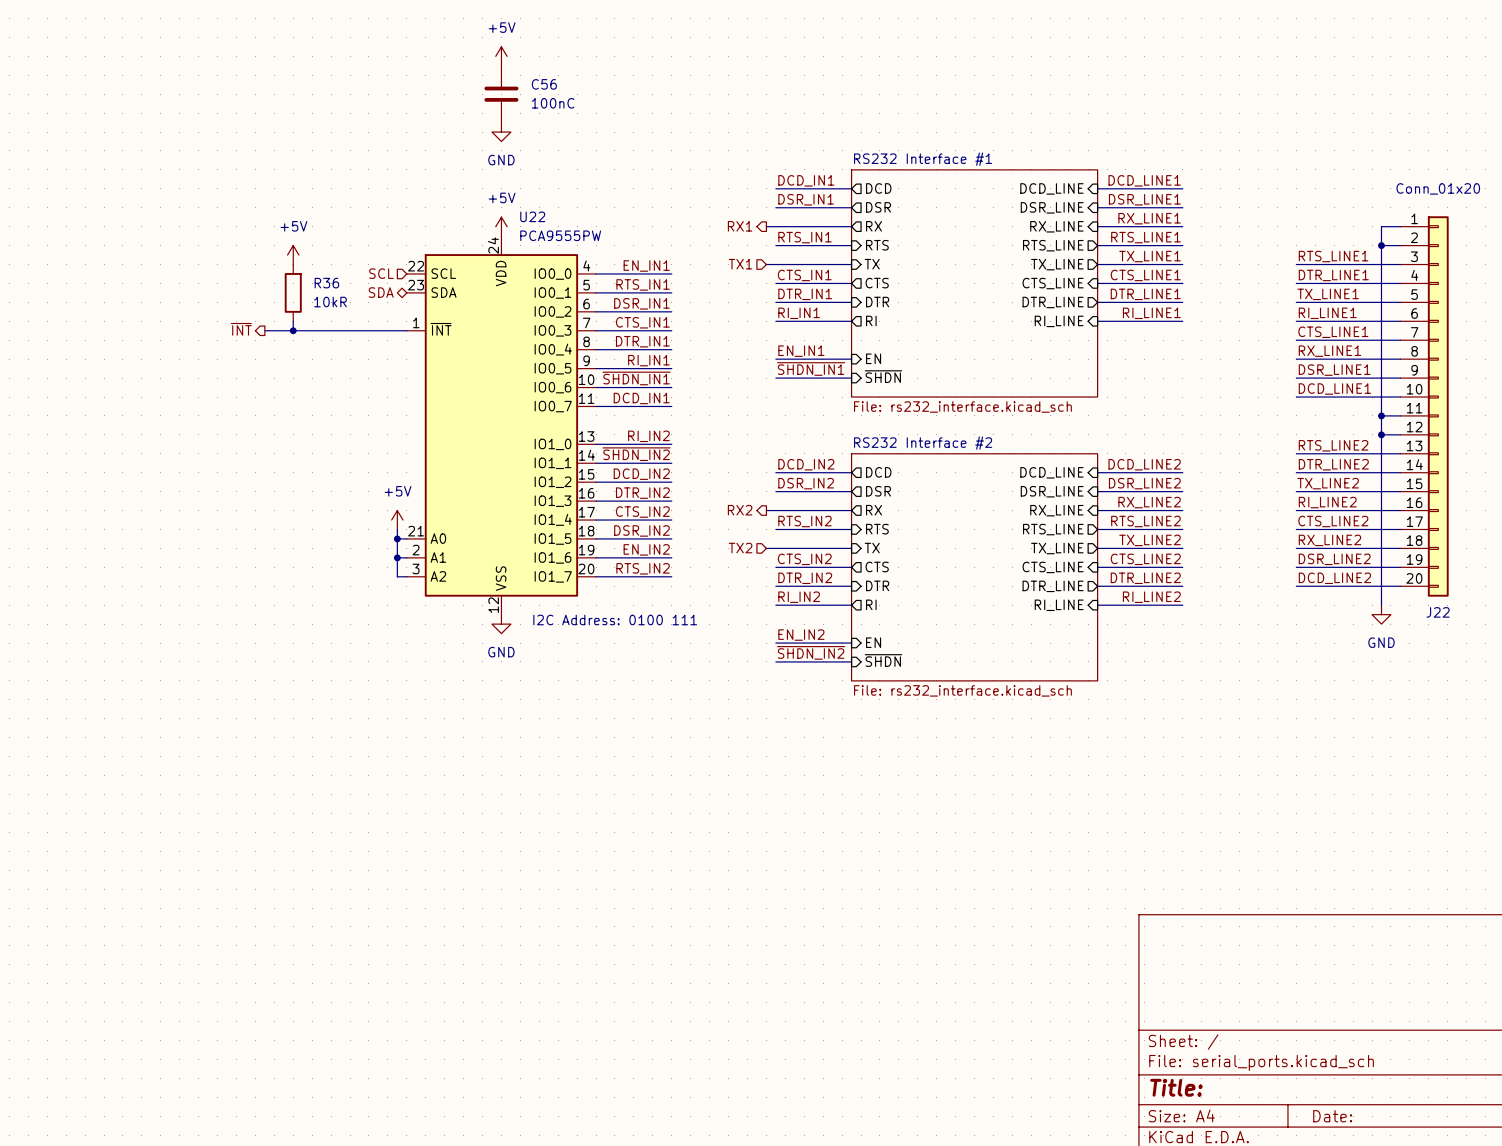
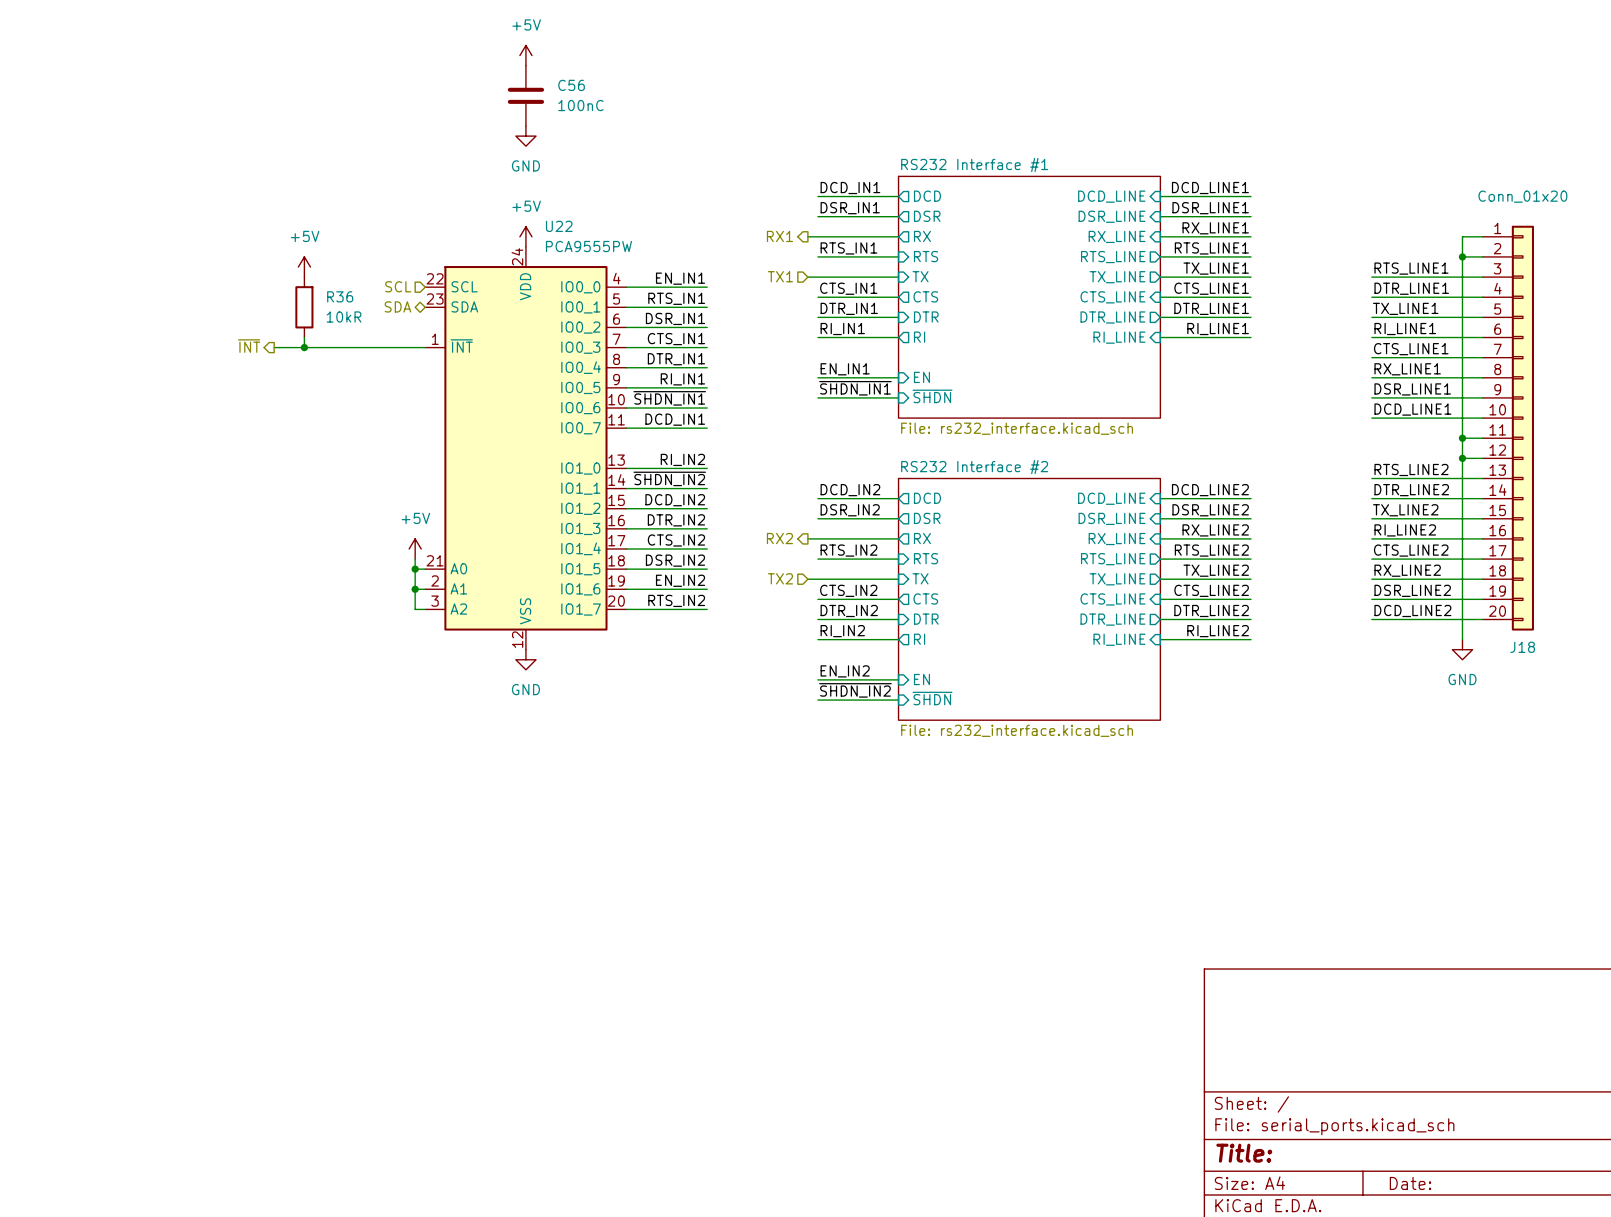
J22 name: J22 (1438, 612) -> J18 (1522, 647)
text: I2C Address: 0100 111 (615, 620) -> none

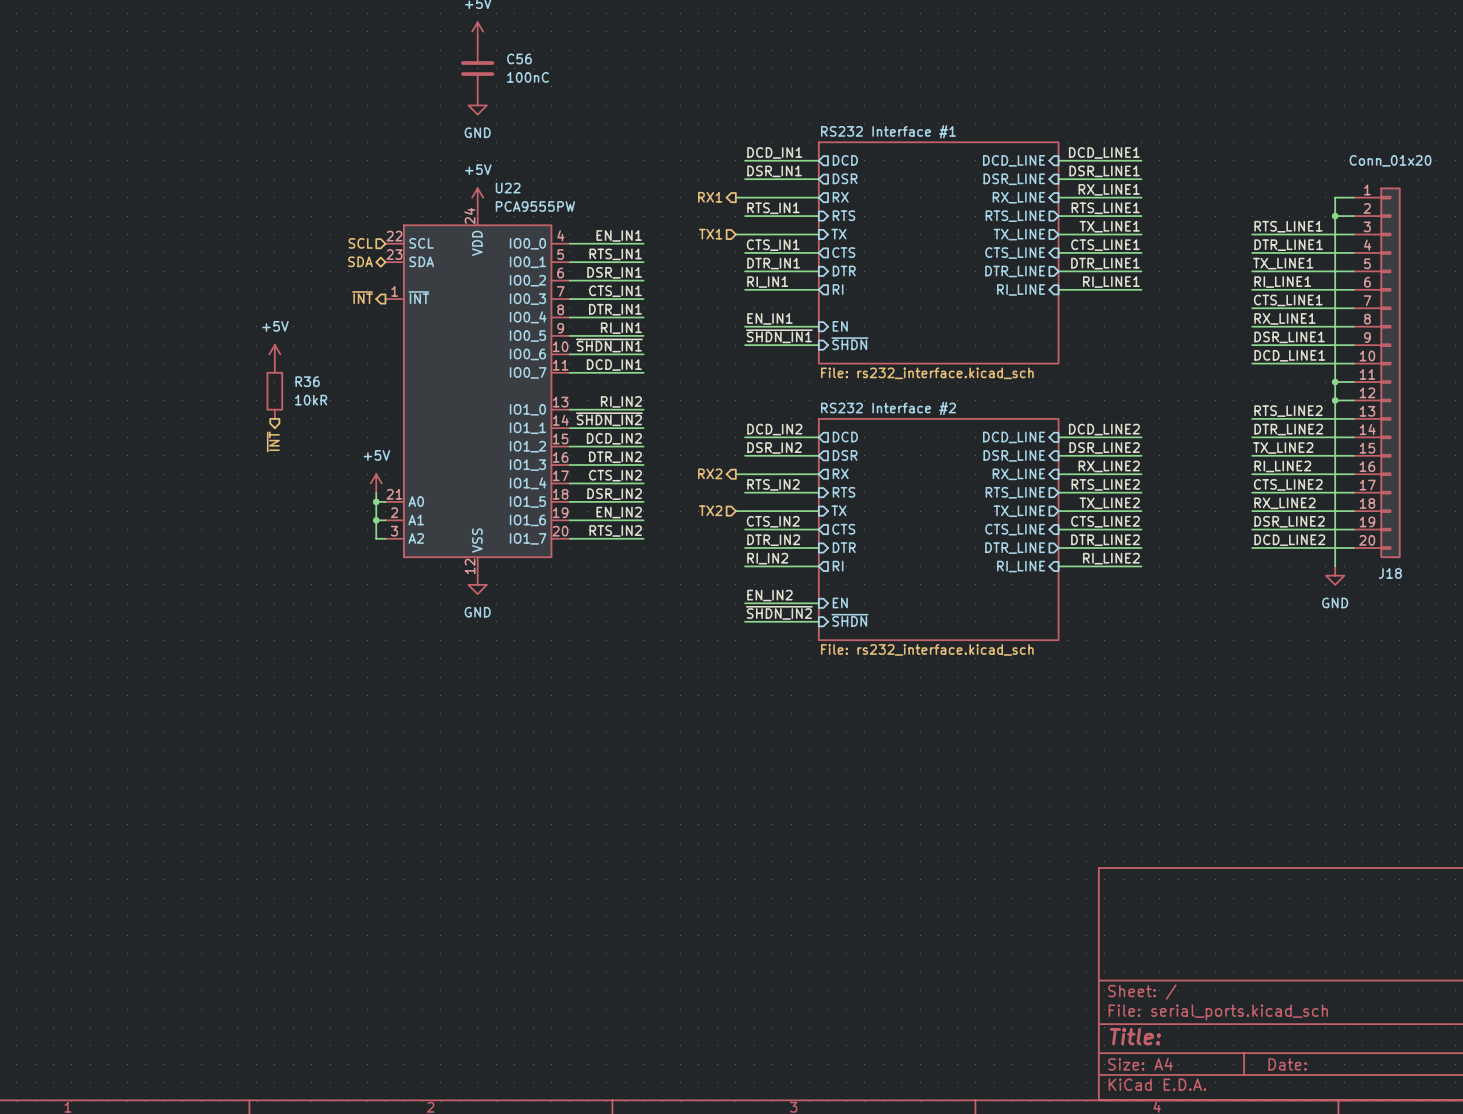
power symbol position: +5V (304, 267) -> +5V (274, 354)
R36 position: (304, 307) -> (274, 391)
wire: (304, 337) (304, 347) -> none
hierarchical label: ~{INT} (249, 346) -> none
hierarchical label: none -> ~{INT} (362, 297)
wire: (274, 347) (425, 347) -> none
junction: (304, 347) -> none
hierarchical label: none -> ~{INT} (273, 441)

